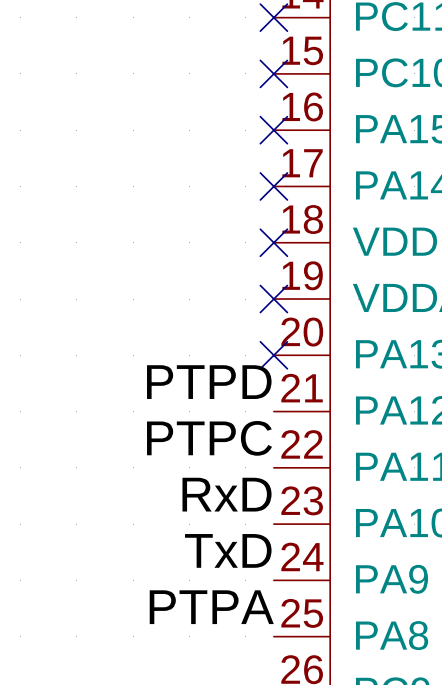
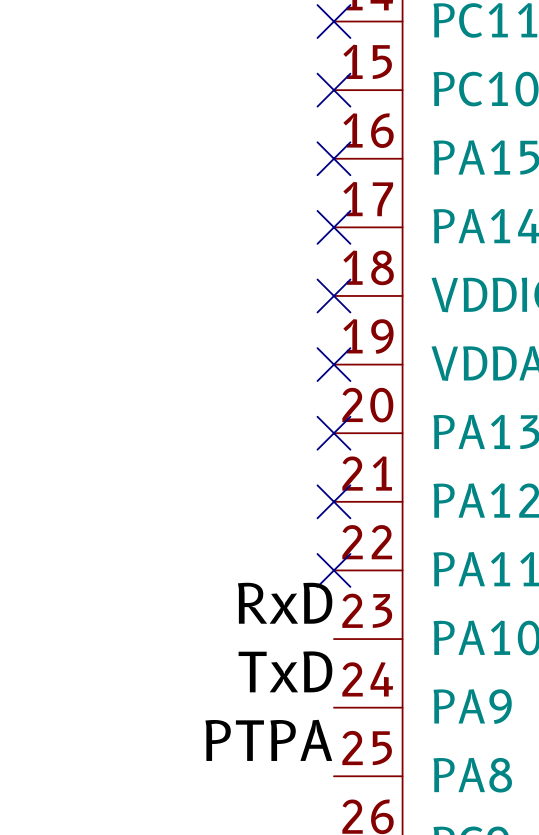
label: PTPD (209, 382) -> none
no-connect mark: none -> (333, 501)
label: PTPC (209, 438) -> none
no-connect mark: none -> (333, 570)

